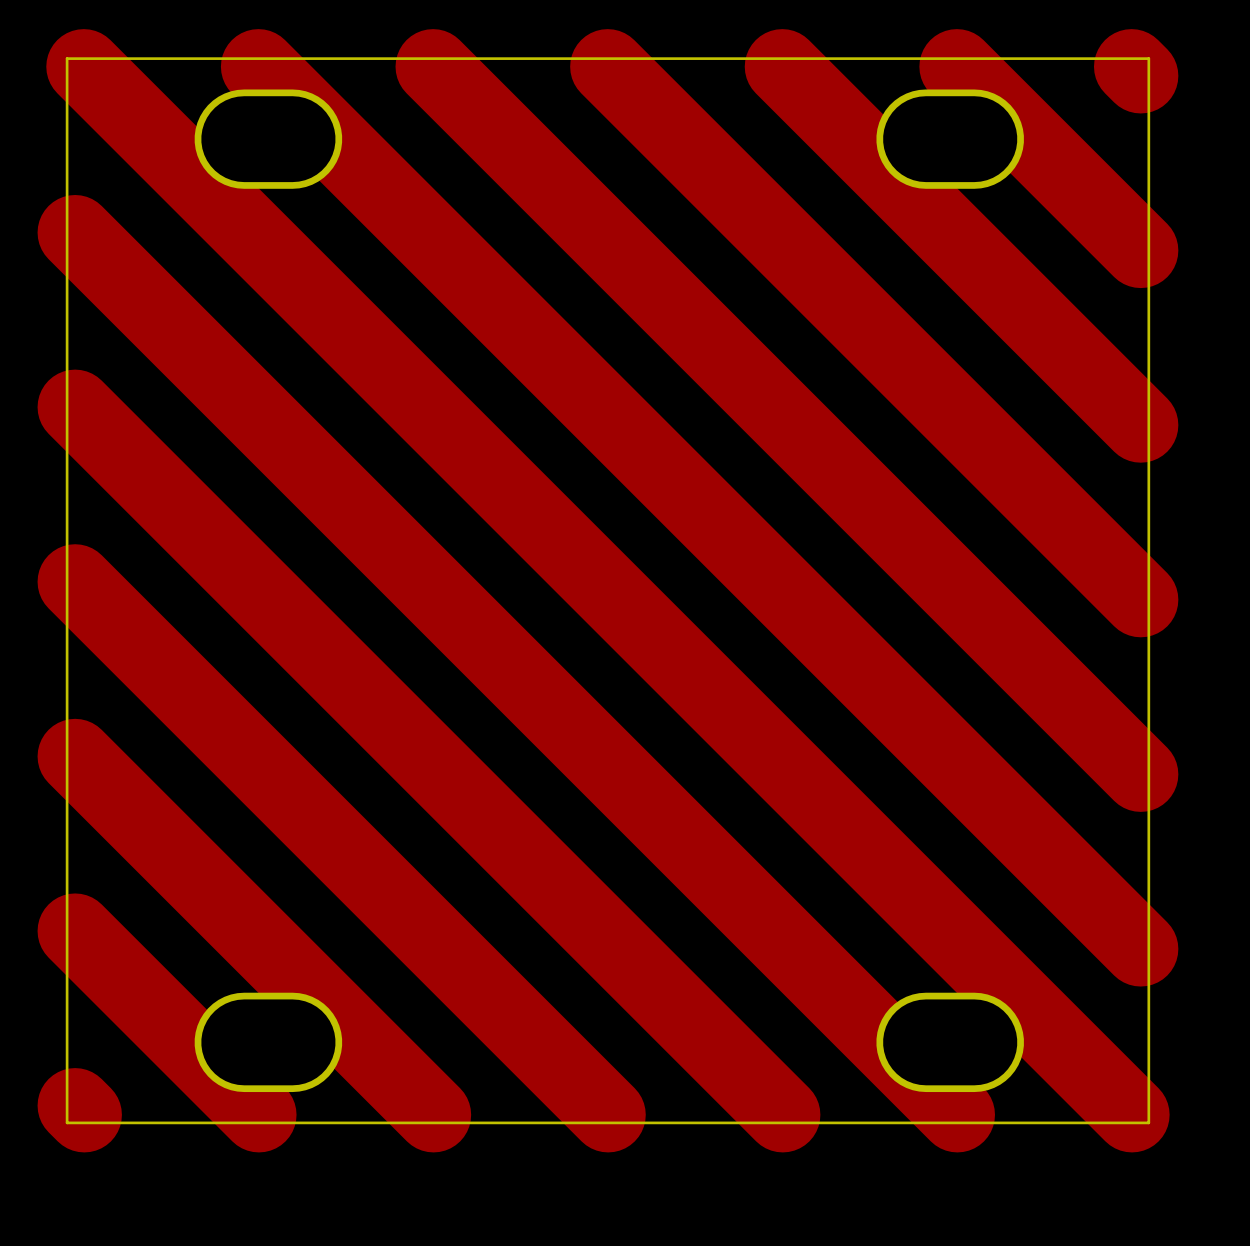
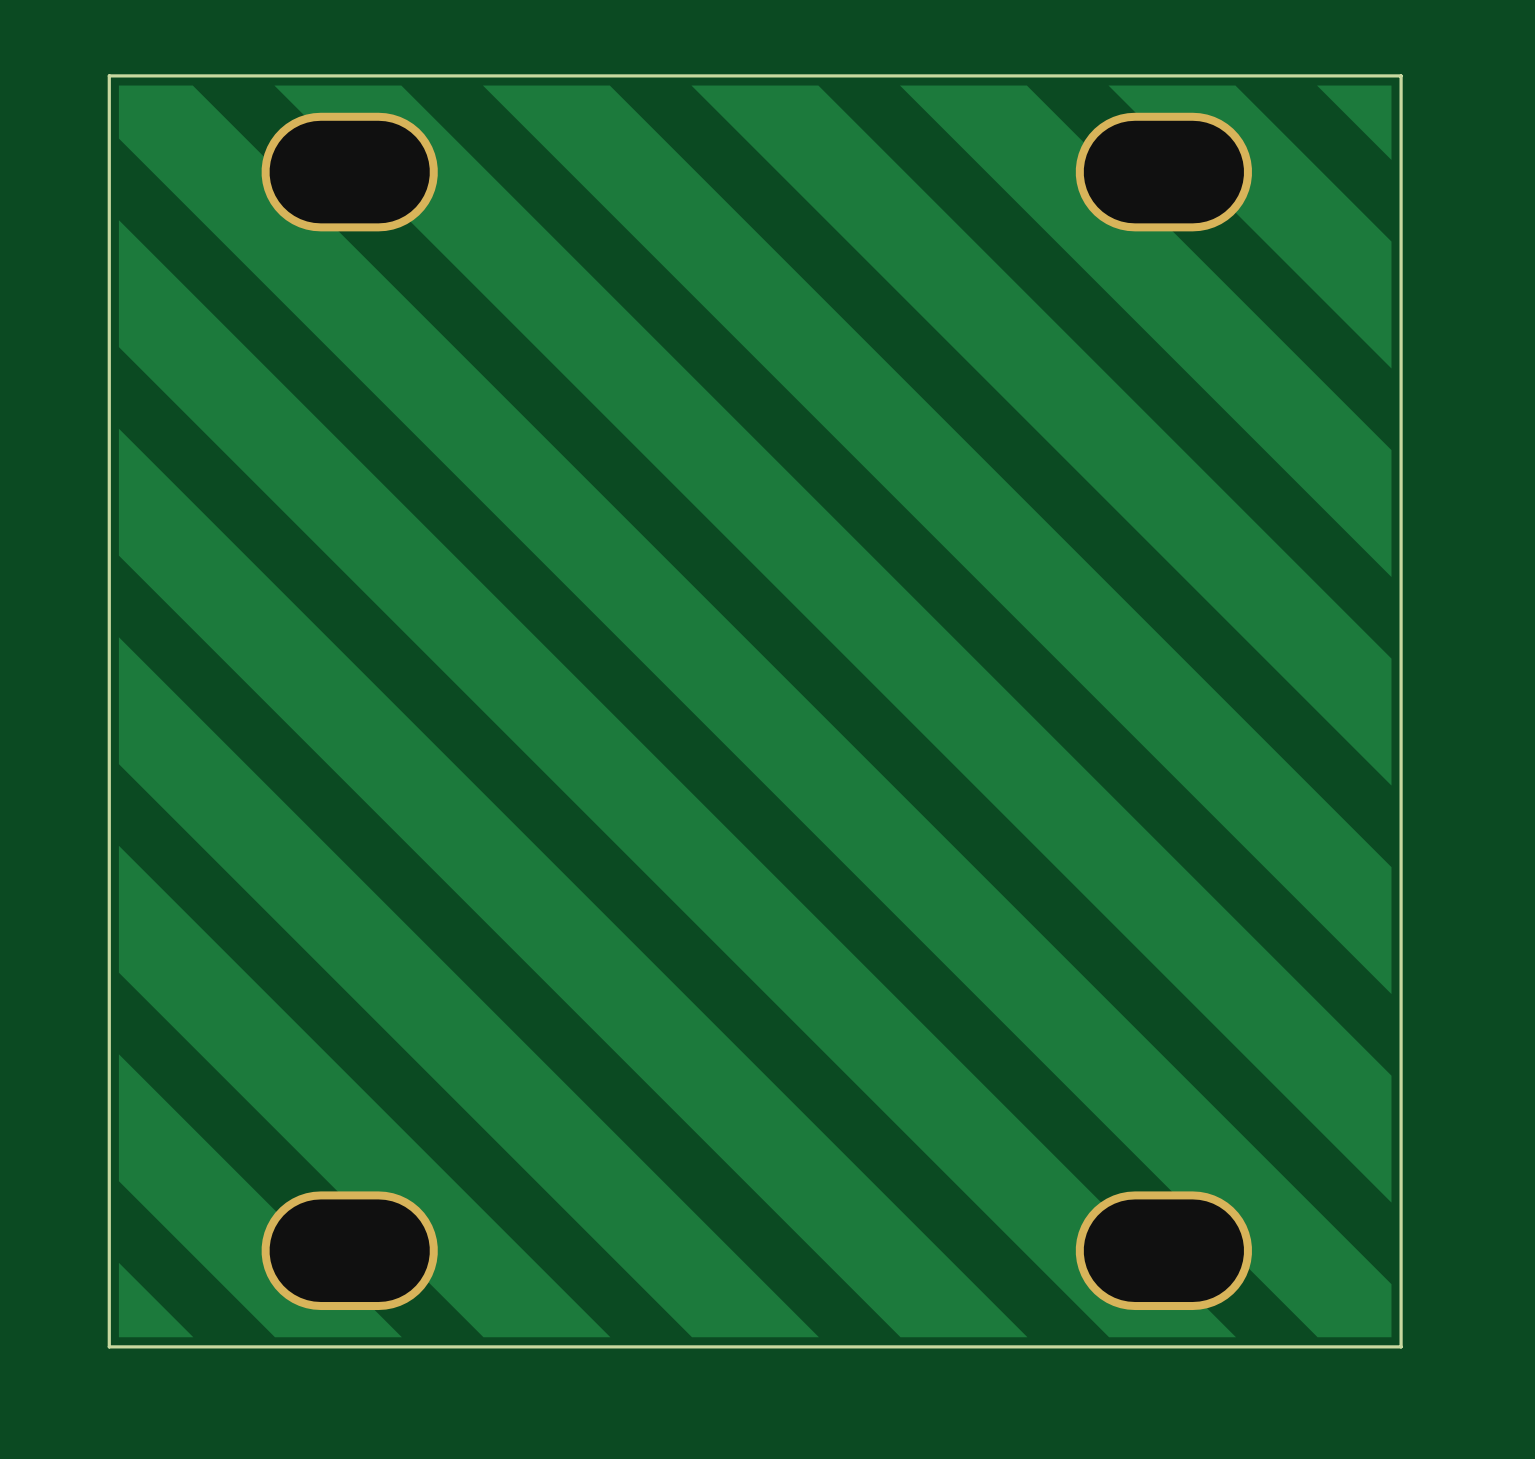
drawing: none -> [118, 85, 1392, 1338]
track: (83, 66) (1132, 1114) -> none
track: (258, 66) (1140, 948) -> none
track: (433, 66) (1140, 774) -> none
track: (607, 66) (1140, 599) -> none
track: (782, 66) (1140, 425) -> none
track: (956, 66) (1140, 250) -> none
track: (1131, 66) (1140, 75) -> none
track: (75, 232) (957, 1114) -> none
track: (75, 407) (782, 1114) -> none
track: (75, 581) (608, 1114) -> none
track: (75, 756) (433, 1114) -> none
track: (75, 931) (258, 1114) -> none
track: (75, 1105) (84, 1114) -> none

